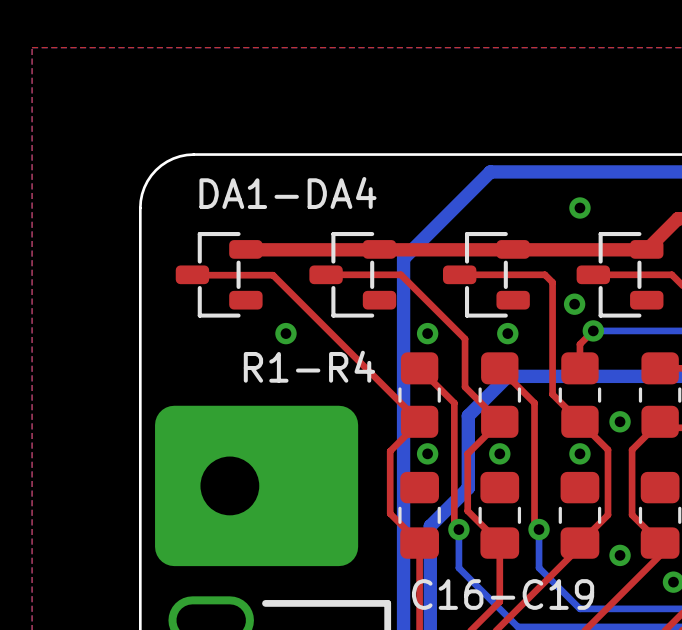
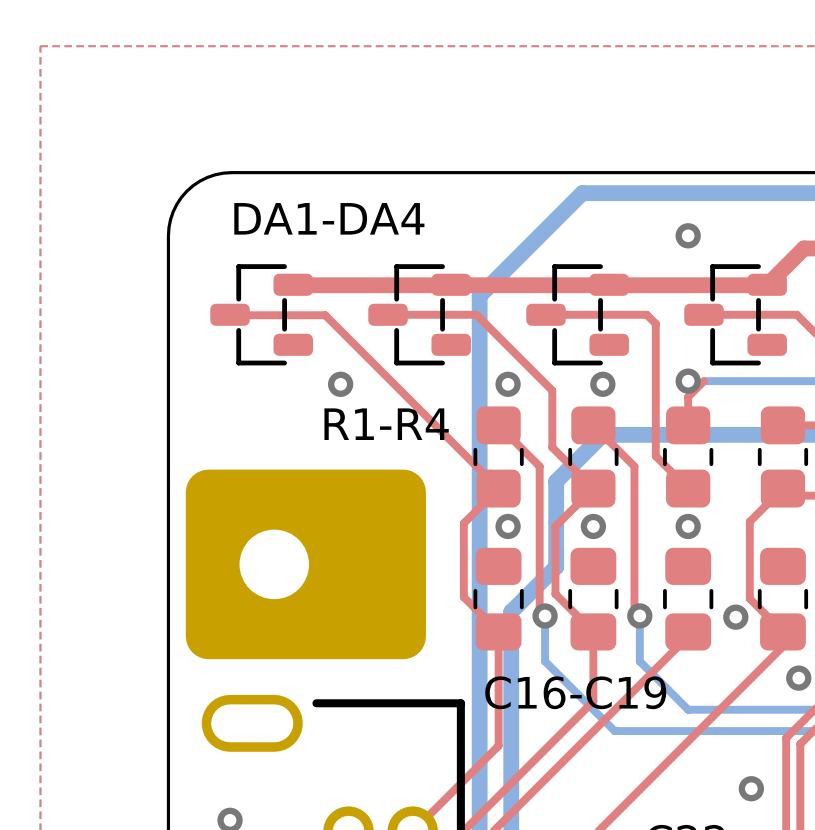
via: (574, 304) -> none
via position: (593, 330) -> (688, 381)
top track: (579, 421) (608, 449) (608, 515) (579, 543) -> none
via: (620, 421) -> none
via position: (620, 555) -> (735, 617)

